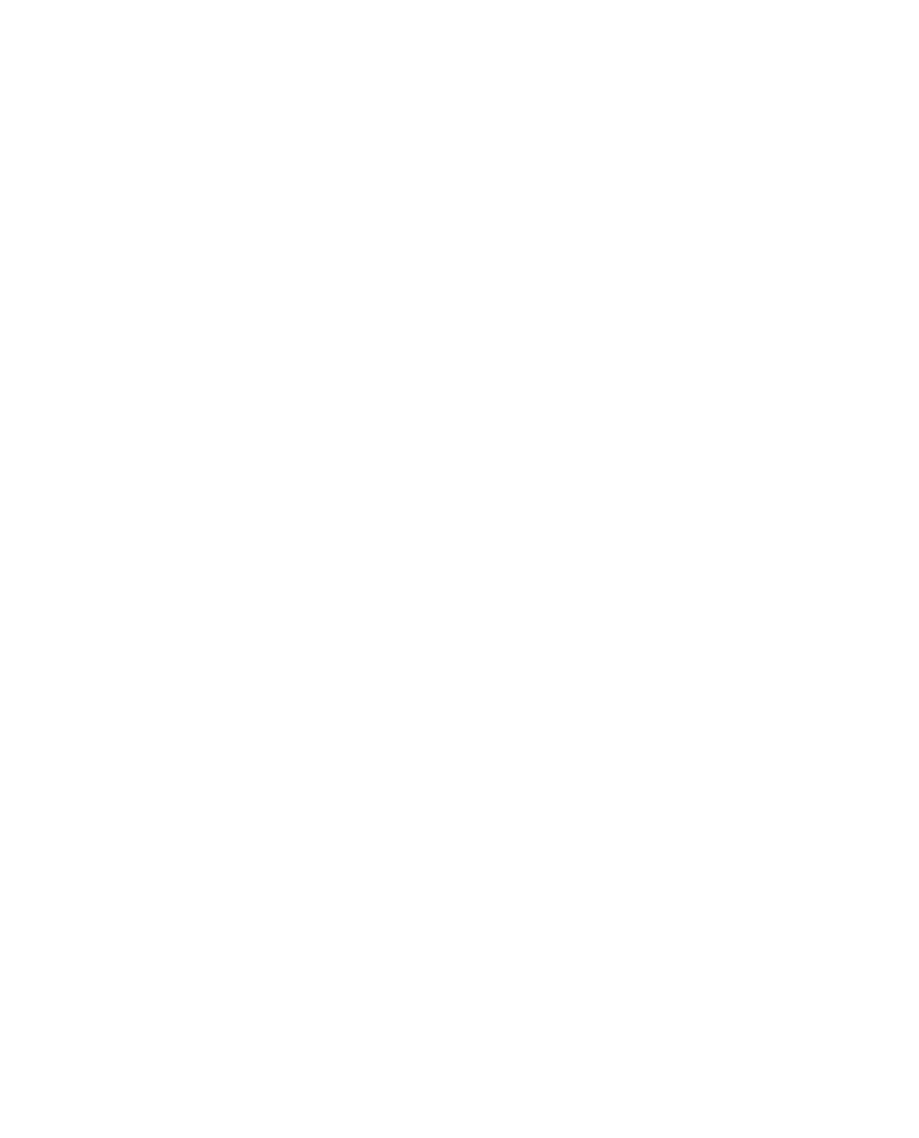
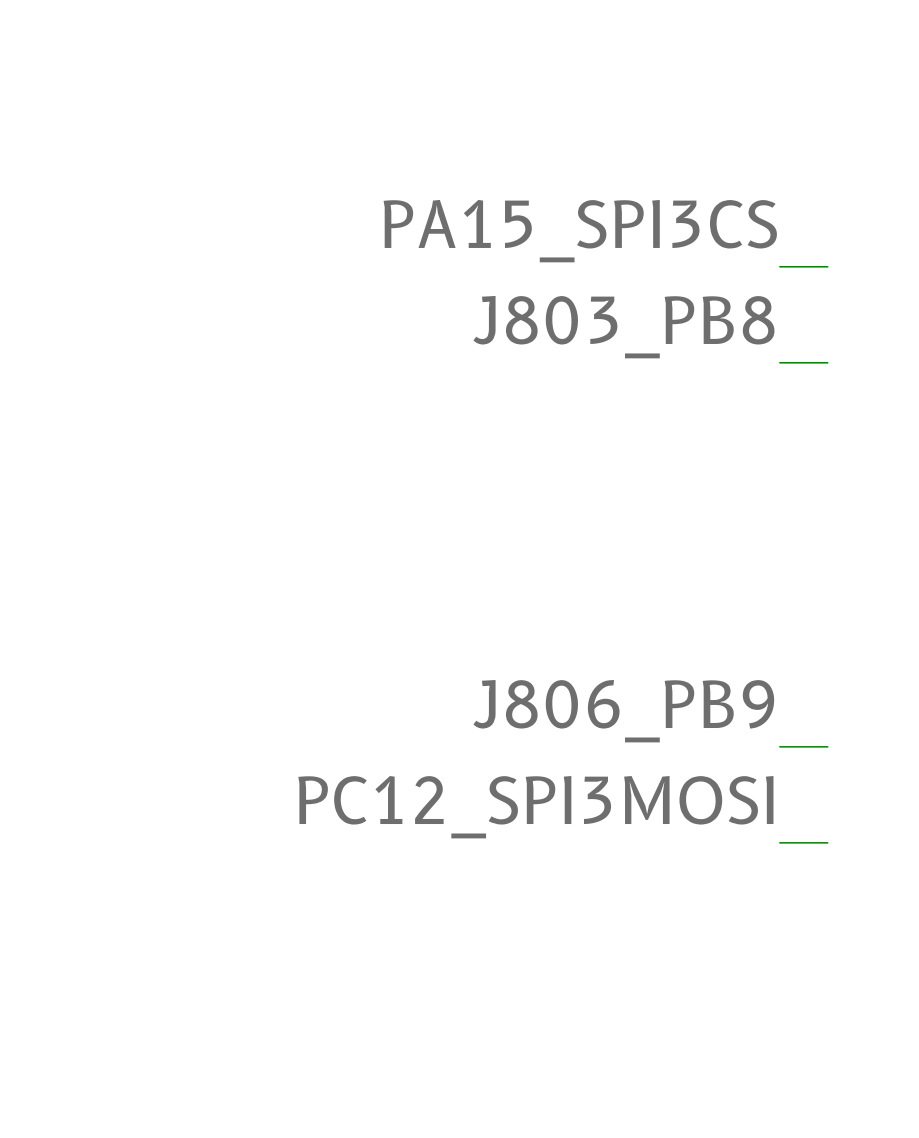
label: none -> PA15_SPI3CS (580, 231)
wire: none -> (779, 266) (827, 266)
label: none -> J803_PB8 (623, 327)
wire: none -> (779, 362) (827, 362)
label: none -> J806_PB9 (623, 711)
wire: none -> (779, 746) (827, 746)
label: none -> PC12_SPI3MOSI (535, 807)
wire: none -> (779, 842) (827, 842)

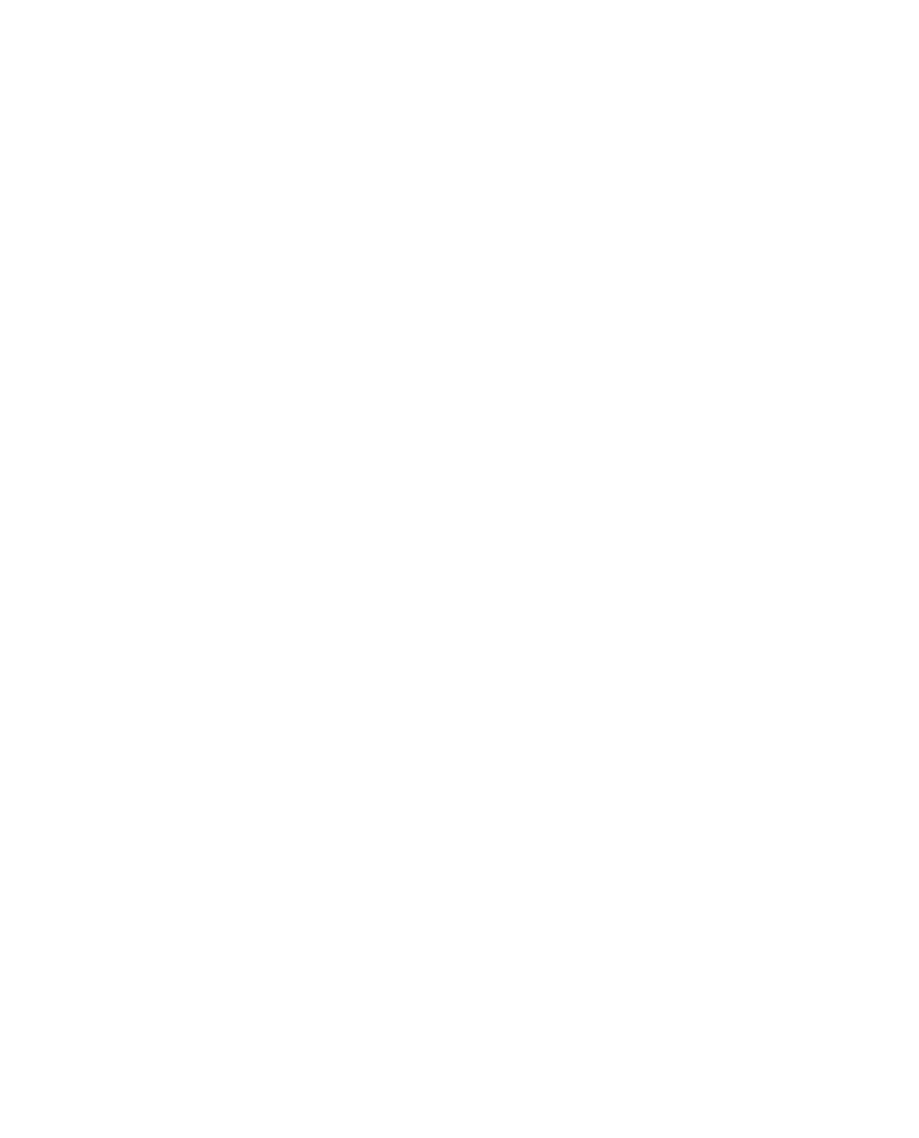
label: PA15_SPI3CS (580, 231) -> none
wire: (779, 266) (827, 266) -> none
label: J803_PB8 (623, 327) -> none
wire: (779, 362) (827, 362) -> none
label: J806_PB9 (623, 711) -> none
wire: (779, 746) (827, 746) -> none
label: PC12_SPI3MOSI (535, 807) -> none
wire: (779, 842) (827, 842) -> none

